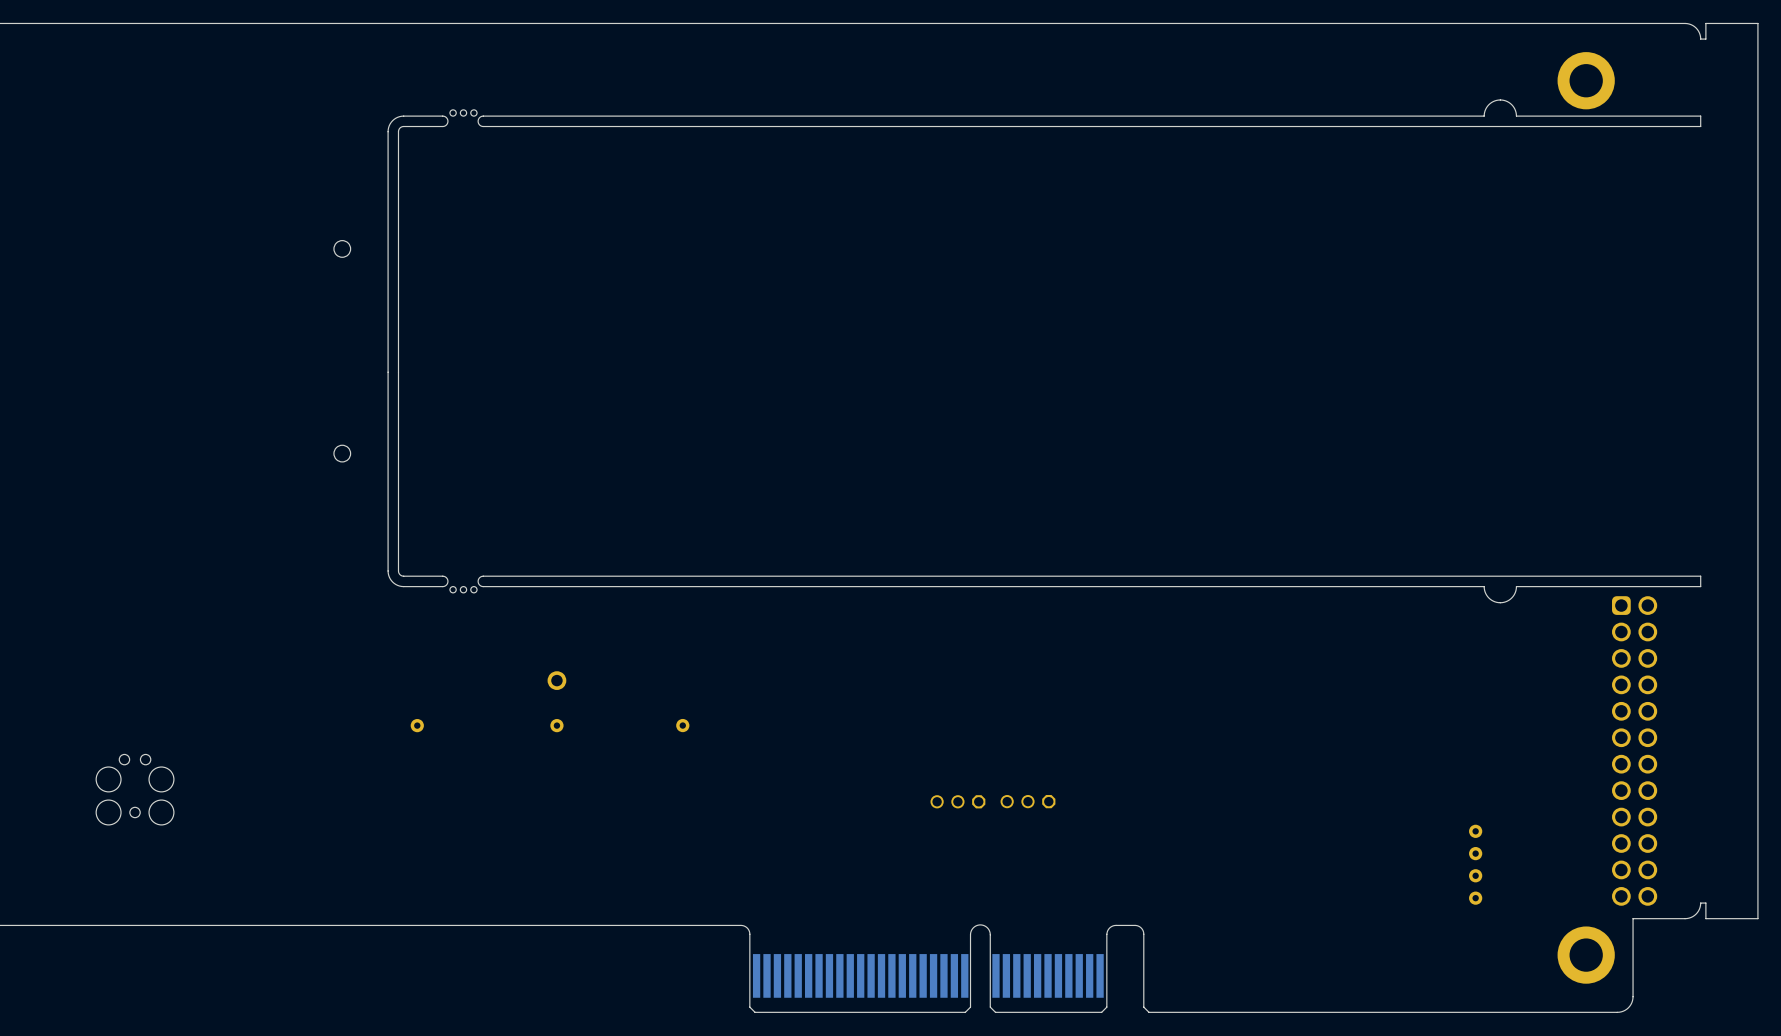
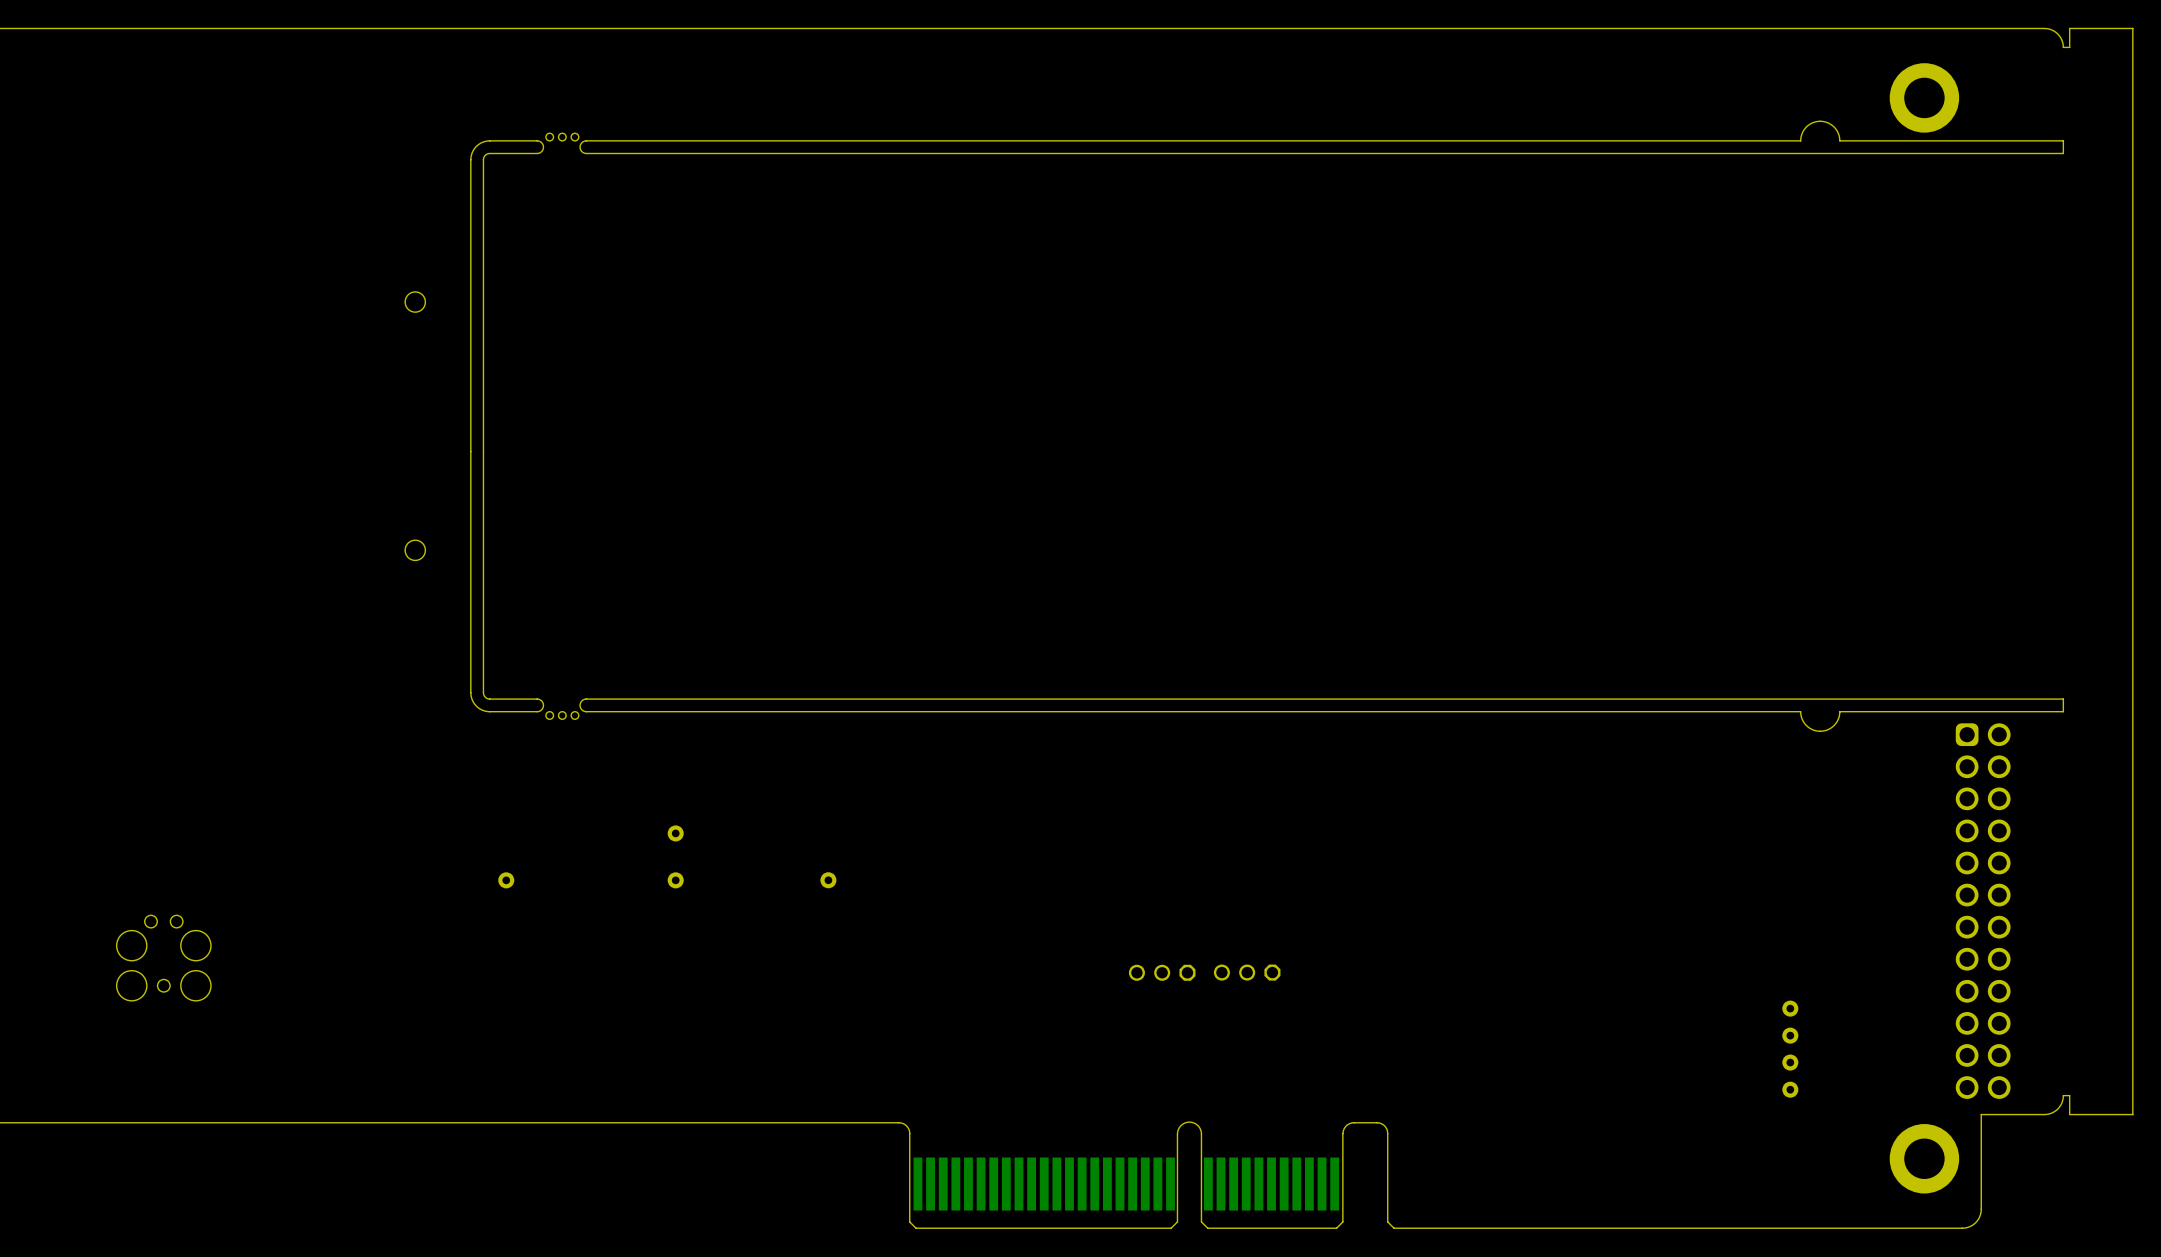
part footprint: [547, 671, 567, 690] -> [667, 825, 684, 842]

